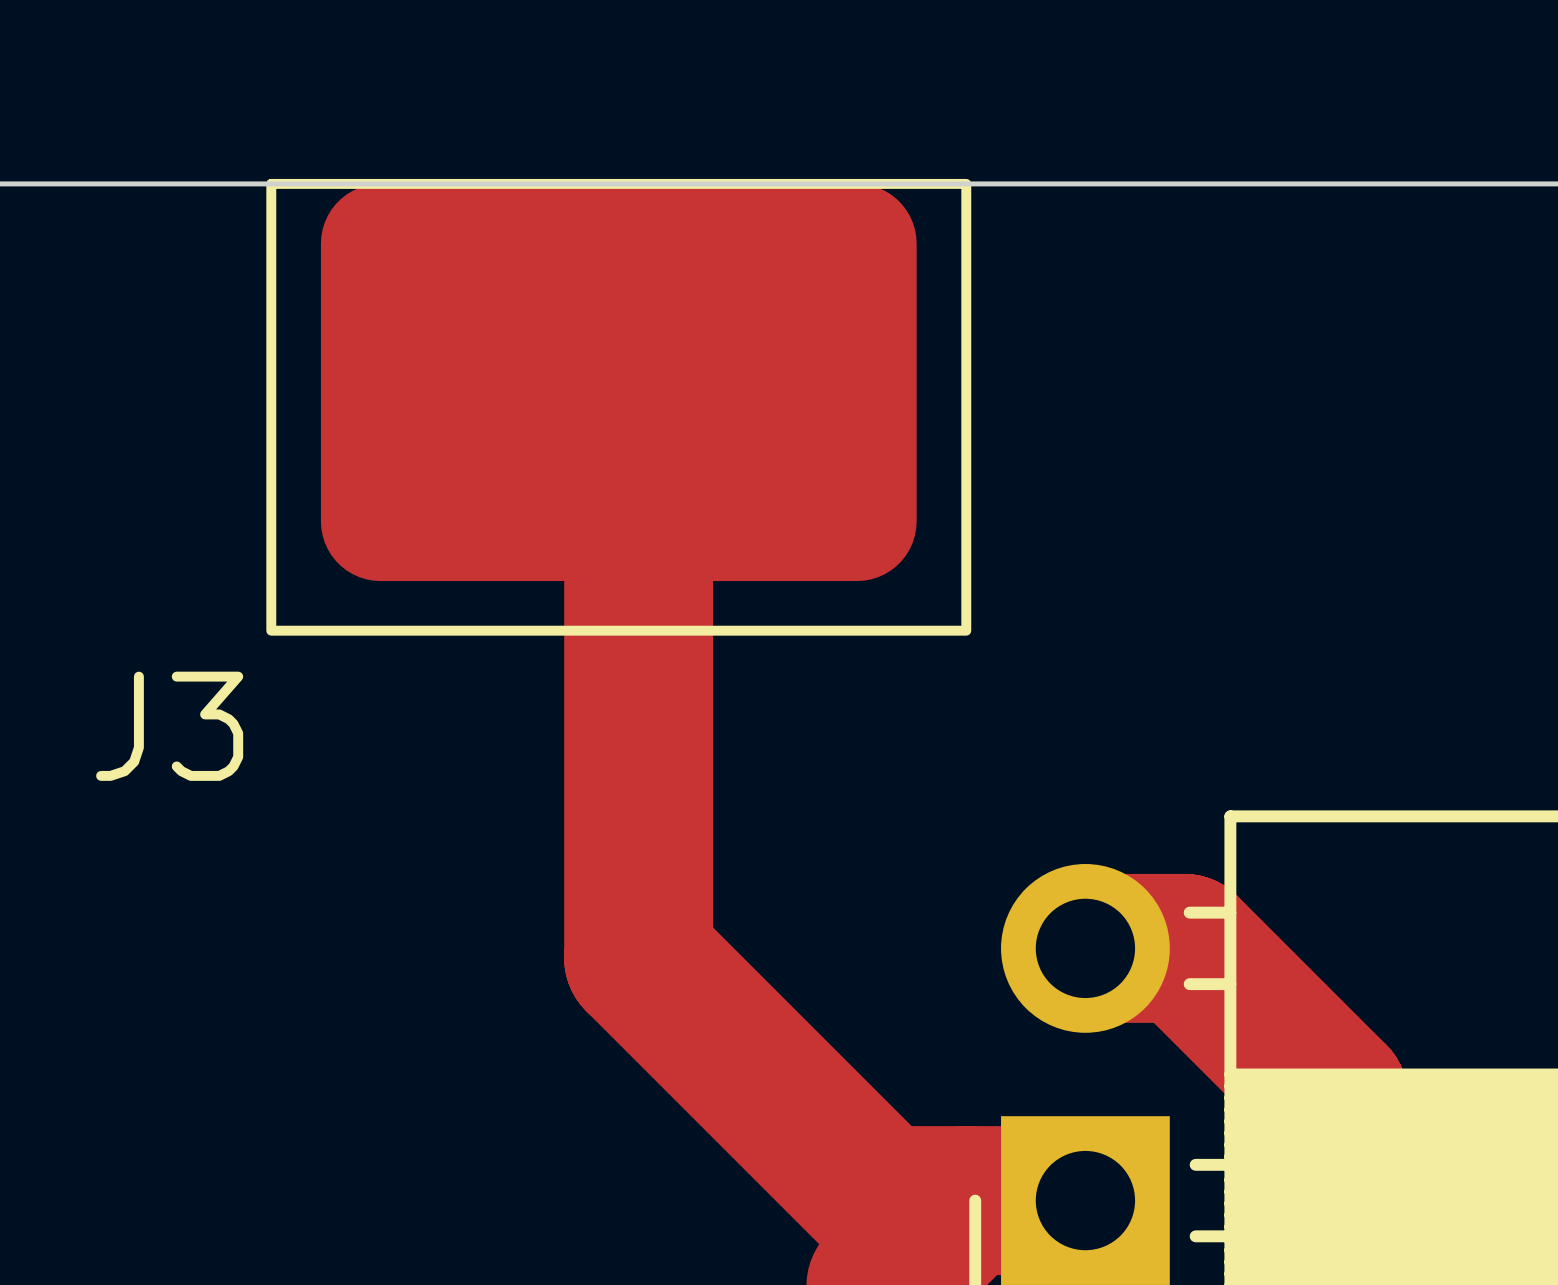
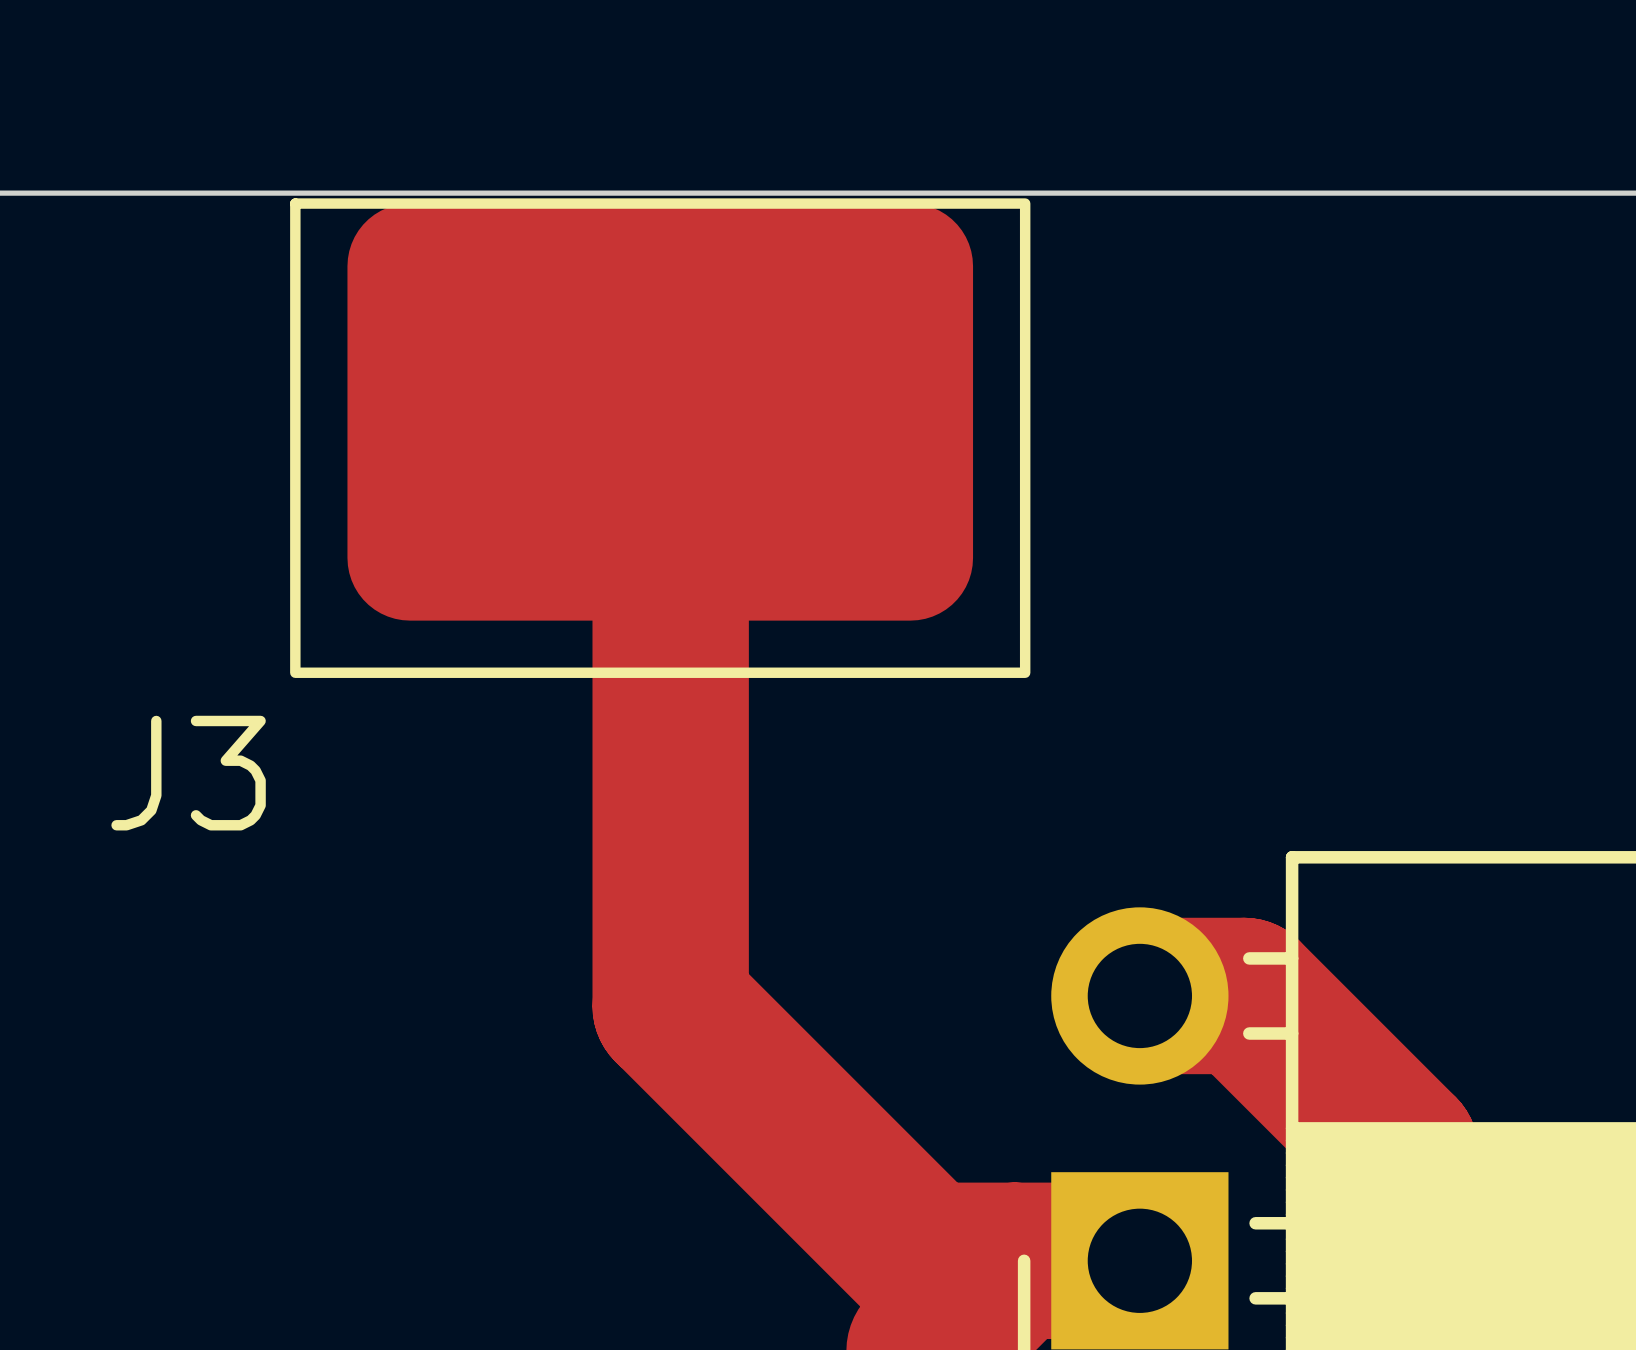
J3 position: (618, 407) -> (660, 438)

